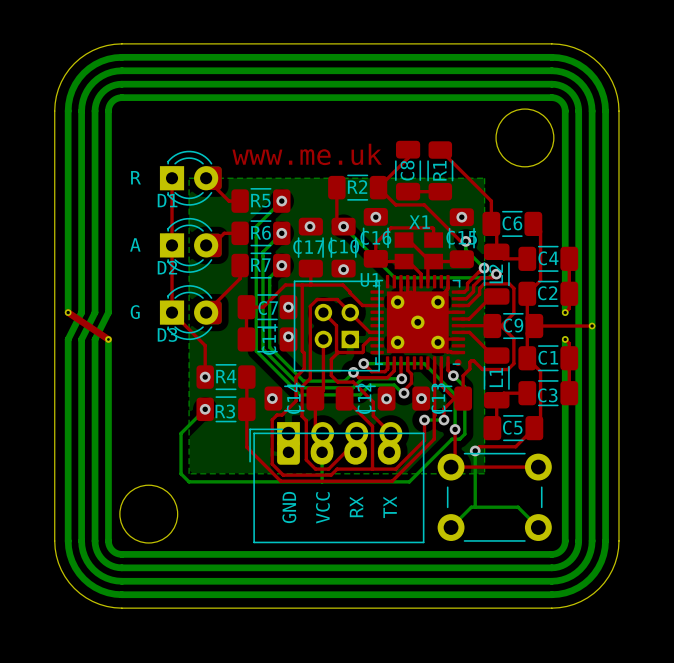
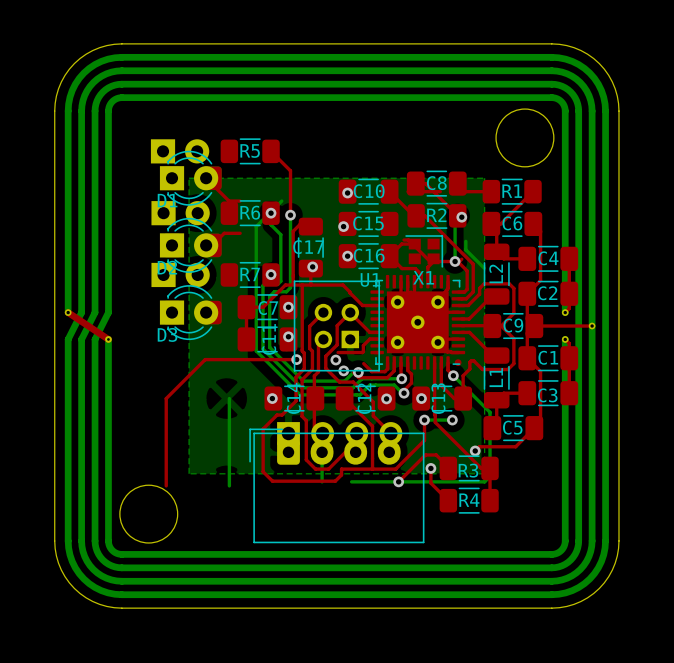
top track: (408, 149) (408, 158) (378, 187) (395, 204) (424, 204) (460, 241) (465, 241) -> none
top track: (440, 150) (491, 201) (491, 223) -> (533, 191) (500, 223) (491, 223)
part: none -> (180, 151)
top track: none -> (271, 151) (290, 170) (290, 215)
text: www.me.uk (307, 154) -> none
C8 rotation: 0° (408, 170) -> 90° clockwise (436, 183)
R1 rotation: 0° (440, 170) -> 90° clockwise (512, 191)
R1 position: (440, 170) -> (512, 191)
text: R (135, 177) -> none
top track: (172, 178) (172, 245) -> none
top track: none -> (415, 183) (425, 183) (457, 215)
top track: none -> (457, 183) (465, 191) (487, 191)
top track: (336, 187) (336, 219) (343, 226) -> none
R2 position: (357, 187) -> (436, 215)
via: none -> (347, 193)
R5 position: (260, 201) -> (250, 151)
via: (281, 201) -> none
part: none -> (180, 213)
via: none -> (271, 213)
via: none -> (290, 215)
bottom track: none -> (457, 215) (455, 218) (455, 261)
via: (375, 217) -> none
X1 name position: X1 (419, 222) -> X1 (423, 277)
top track: none -> (312, 224) (300, 224) (293, 231) (293, 283)
via: (309, 226) -> none
bottom track: (343, 226) (394, 277) (488, 277) (492, 274) (496, 274) -> none
X1 footprint: [394, 232, 443, 270] -> [405, 235, 444, 268]
R6 position: (260, 233) -> (250, 213)
bottom track: (281, 233) (262, 252) (262, 285) -> (271, 213) (271, 224) (280, 234) (280, 281) (277, 284) (262, 285)
via: (281, 233) -> none
C16 rotation: 0° (375, 237) -> 90° clockwise (368, 256)
C15 rotation: 0° (461, 238) -> 90° clockwise (368, 223)
C15 position: (461, 238) -> (368, 223)
top track: (433, 240) (432, 227) (391, 227) (375, 243) (375, 258) (378, 261) (408, 261) (421, 274) -> (414, 244) (401, 244) (389, 256) (402, 268) (415, 268) (421, 274)
via: (465, 241) -> none
text: A (135, 244) -> none
top track: (172, 245) (172, 312) -> none
C10 rotation: 0° (343, 247) -> 90° clockwise (368, 191)
C10 position: (343, 247) -> (368, 191)
via: none -> (455, 261)
top track: (240, 265) (240, 278) (206, 312) -> none
R7 position: (260, 265) -> (250, 274)
bottom track: (281, 265) (269, 277) (269, 296) -> (290, 215) (290, 287) (286, 291) (274, 291) (269, 296)
via position: (281, 265) -> (271, 274)
via: none -> (312, 266)
top track: (484, 268) (467, 283) (467, 289) -> (457, 261) (467, 270) (467, 289)
via: (484, 268) -> none
via position: (343, 269) -> (347, 256)
part: none -> (180, 274)
top track: (496, 274) (492, 277) (481, 277) (473, 285) (473, 291) -> (389, 191) (413, 215) (424, 215) (473, 264) (473, 291)
via: (496, 274) -> none
text: G (135, 312) -> none
top track: (172, 312) (205, 345) (205, 377) -> none
top track: (323, 312) (336, 325) (338, 352) (331, 359) (331, 375) (339, 382) -> (350, 312) (337, 325) (337, 344) (325, 356) (325, 368) (339, 382)
top track: (350, 312) (337, 299) (317, 299) (310, 306) (310, 378) (302, 386) -> (323, 312) (309, 326) (312, 369) (302, 379) (302, 386)
top track: (323, 339) (323, 390) (315, 398) (315, 426) (322, 433) -> (323, 339) (318, 344) (318, 371) (314, 376) (314, 428) (322, 436) (322, 452)
top track: none -> (296, 359) (205, 359) (166, 398) (166, 485)
via: none -> (296, 359)
via: none -> (335, 360)
bottom track: (363, 363) (424, 363) (455, 394) (455, 429) -> none
via: (363, 363) -> none
via: none -> (343, 370)
via: (353, 372) -> none
via: none -> (358, 372)
via: (205, 377) -> none
R4 position: (226, 377) -> (469, 500)
top track: (246, 377) (246, 447) (280, 481) -> (272, 419) (263, 428) (263, 471) (272, 481) (280, 481)
bottom track: (464, 387) (464, 434) (459, 439) (452, 439) (409, 481) -> (464, 387) (490, 412) (490, 476) (484, 481) (409, 481)
bottom track: none -> (229, 398) (229, 485)
top track: (454, 398) (444, 408) (444, 420) -> none
bottom track: (205, 409) (181, 433) (181, 473) (189, 481) (351, 481) -> none
via: (205, 409) -> none
R3 position: (226, 409) -> (469, 468)
top track: (434, 410) (434, 439) (392, 481) (335, 481) -> none
top track: none -> (435, 415) (435, 422) (481, 468) (490, 468) (490, 500)
top track: (272, 419) (272, 464) (283, 475) (331, 475) (337, 469) (341, 469) -> (335, 481) (341, 474) (341, 469)
via: (444, 420) -> none
via: none -> (452, 420)
top track: (455, 429) (455, 463) (451, 467) (538, 467) -> none
via: (455, 429) -> none
bottom track: (475, 450) (475, 507) -> none
top track: none -> (430, 468) (430, 483) (448, 500)
via: none -> (430, 468)
top track: none -> (448, 468) (436, 454) (425, 454) (398, 481)
via: none -> (398, 481)
part: (494, 497) -> none
text: RX (356, 506) -> none
text: GND (289, 507) -> none
text: VCC (322, 507) -> none
text: TX (390, 507) -> none
bottom track: (451, 527) (471, 507) (518, 507) (538, 527) -> none

